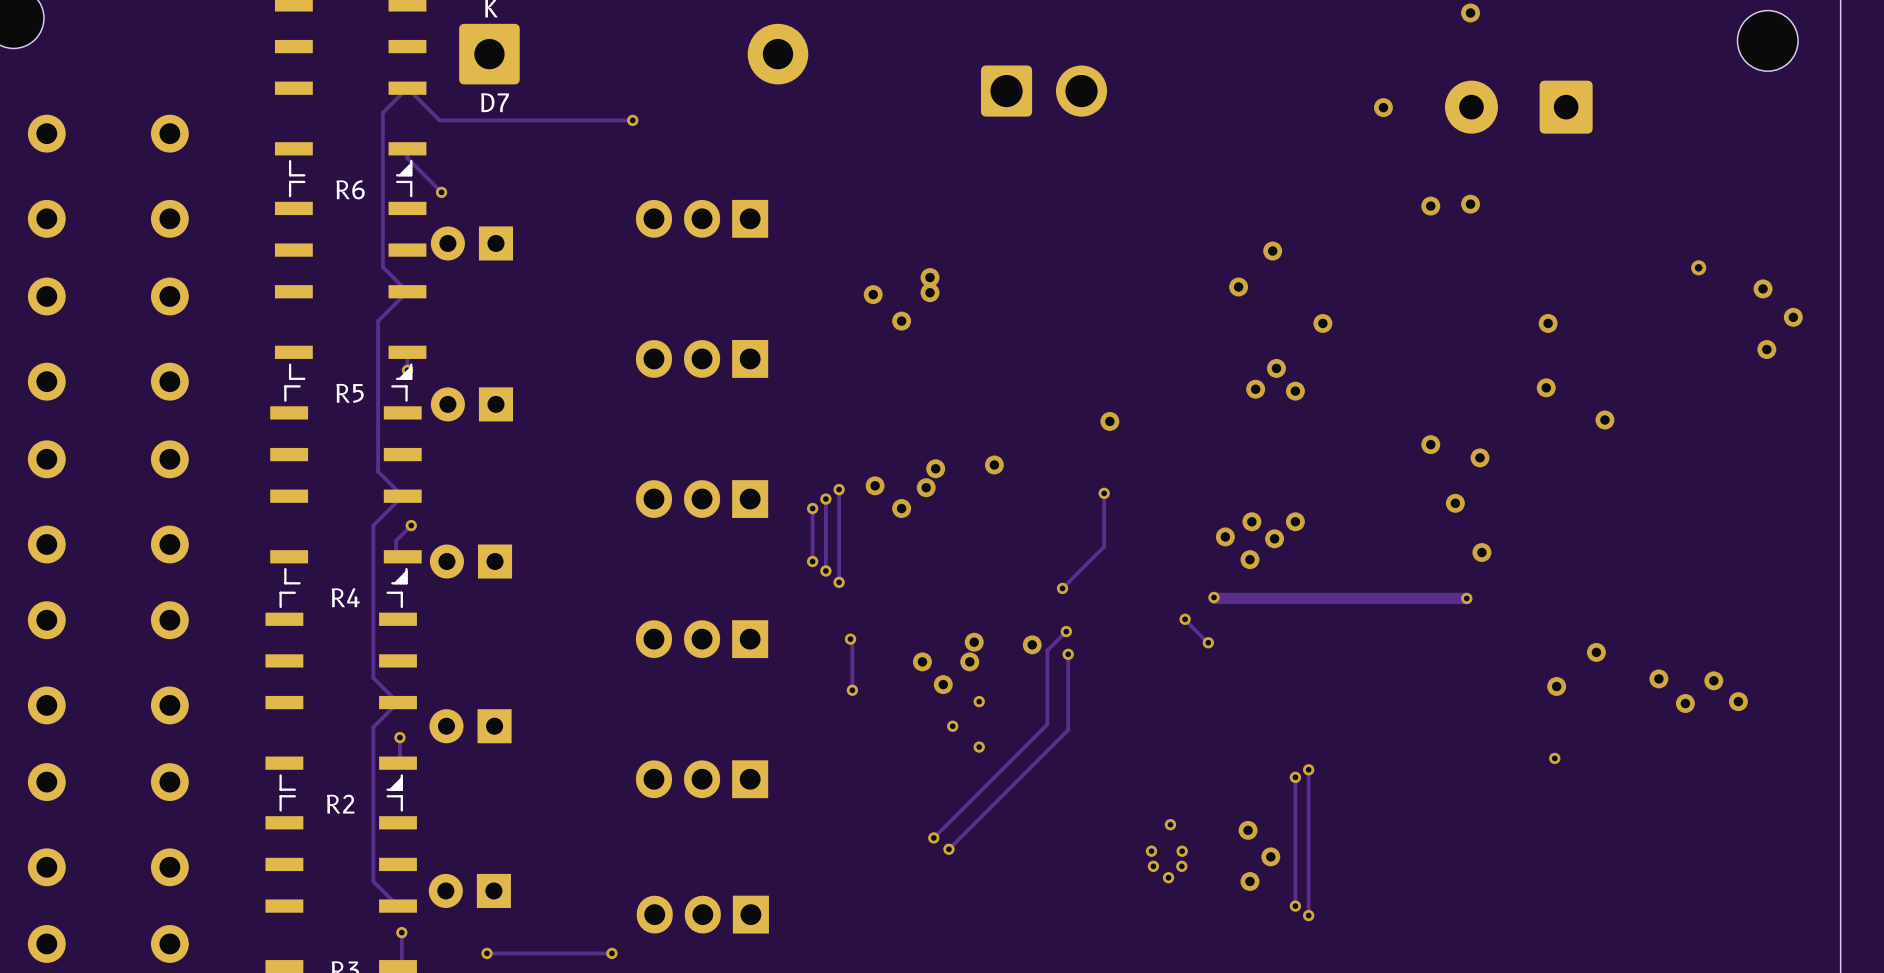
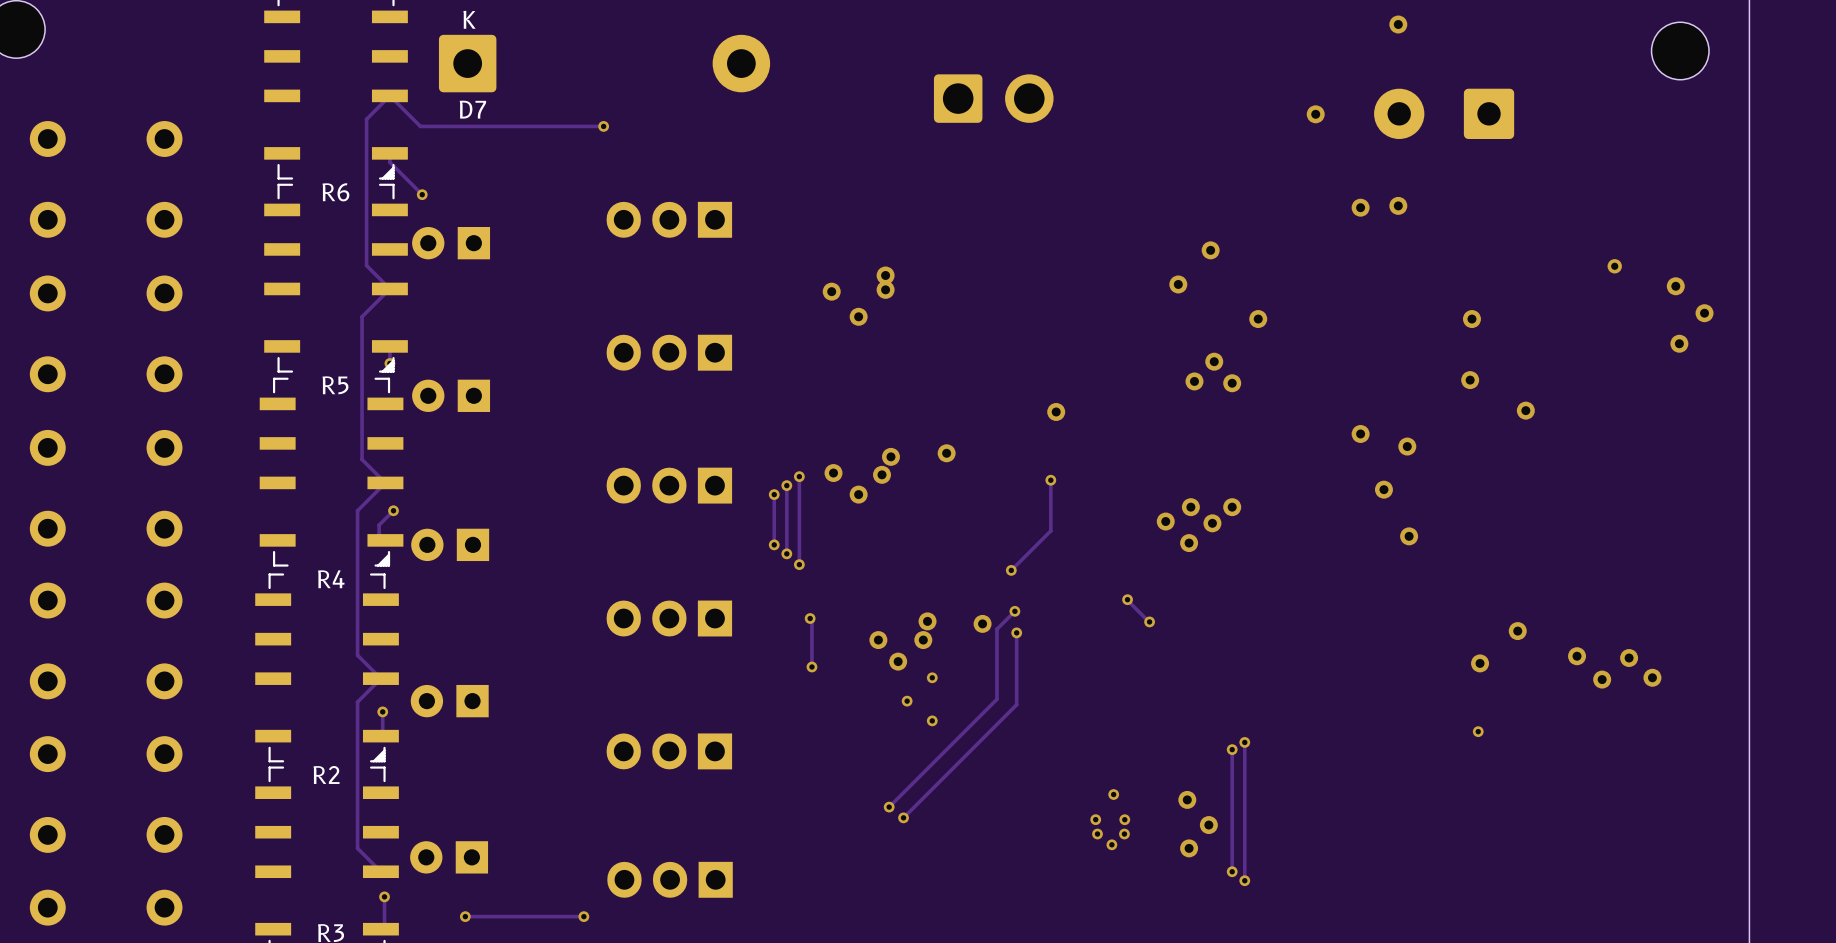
track: (1214, 597) (1466, 598) -> none
via: (1214, 597) -> none
via: (1466, 598) -> none

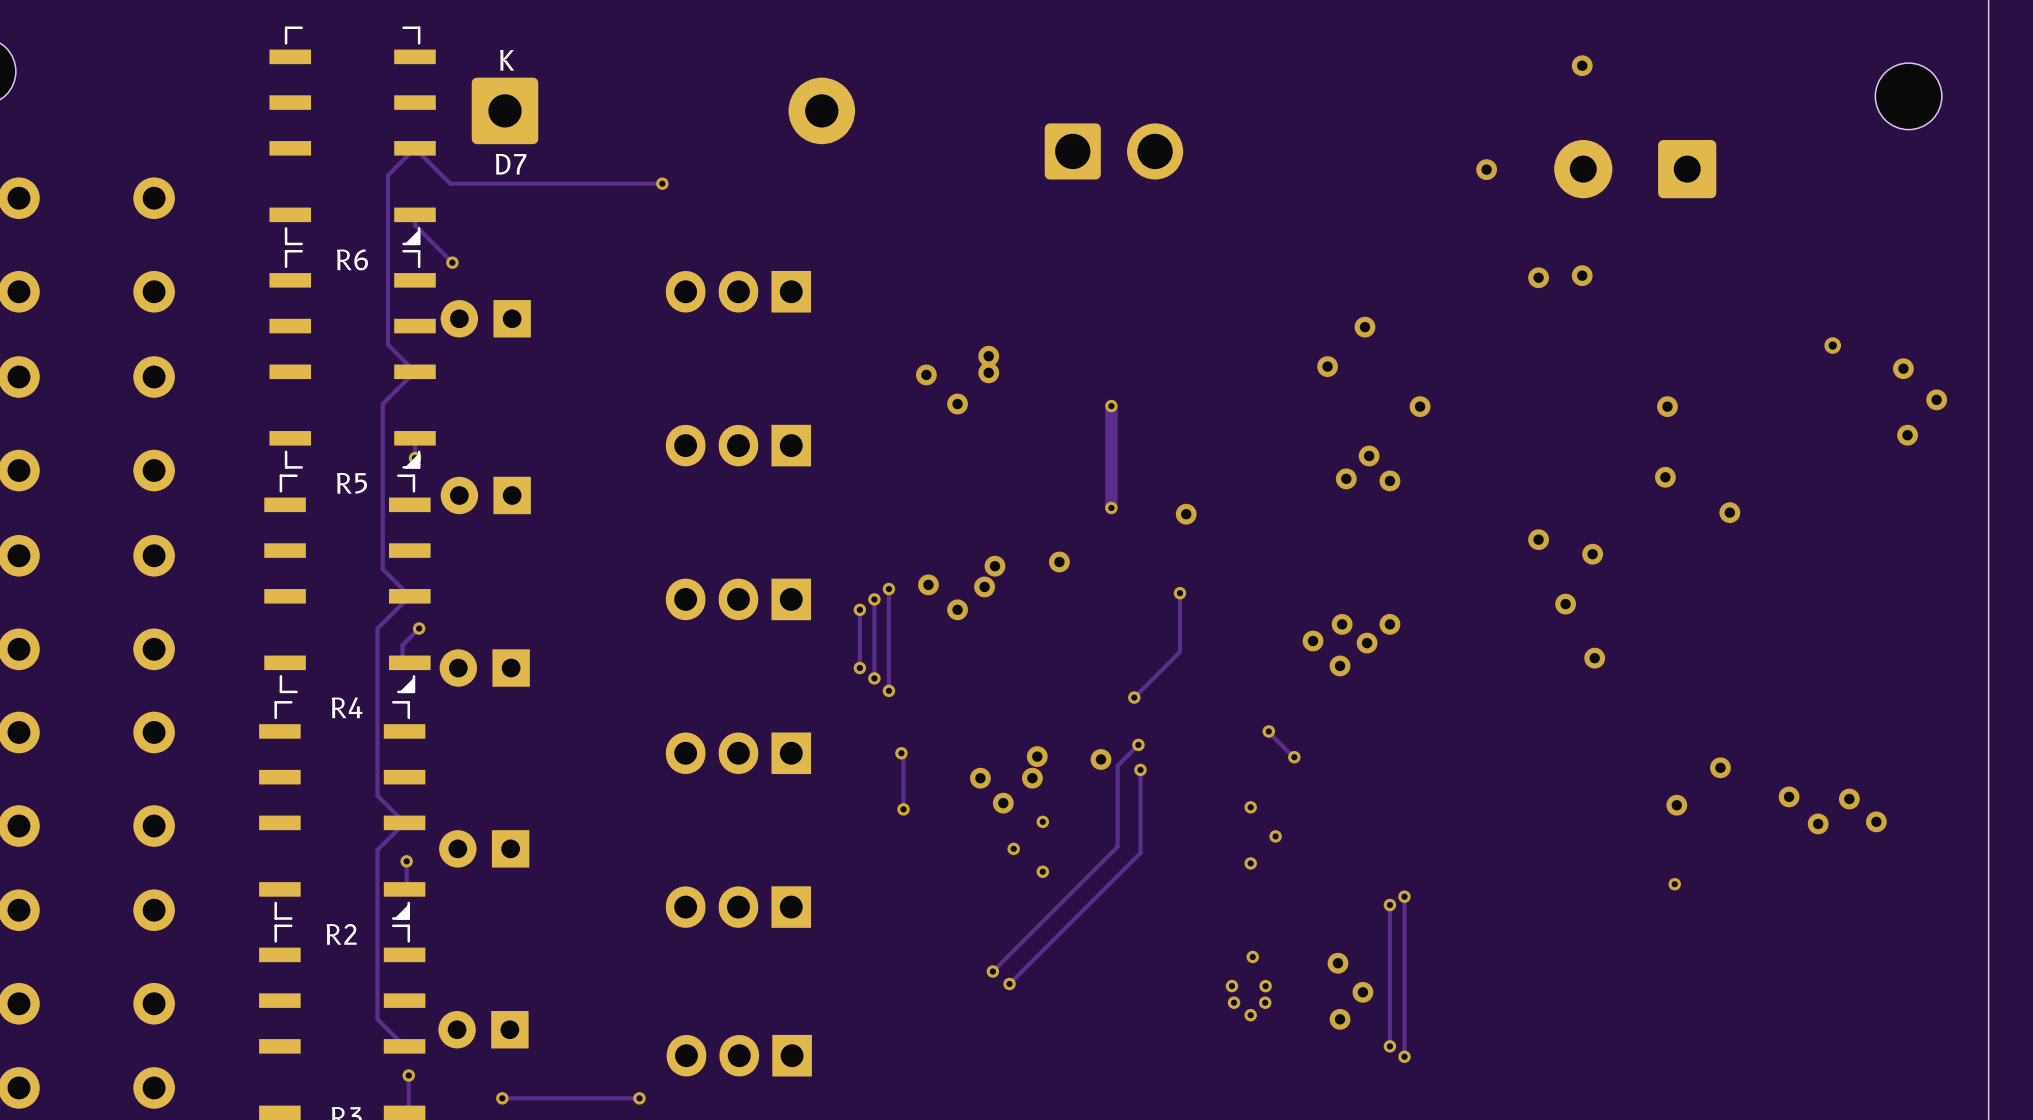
track: none -> (1111, 406) (1111, 507)
via: none -> (1111, 406)
via: none -> (1111, 507)
via: none -> (1250, 807)
via: none -> (1275, 836)
via: none -> (1250, 863)

